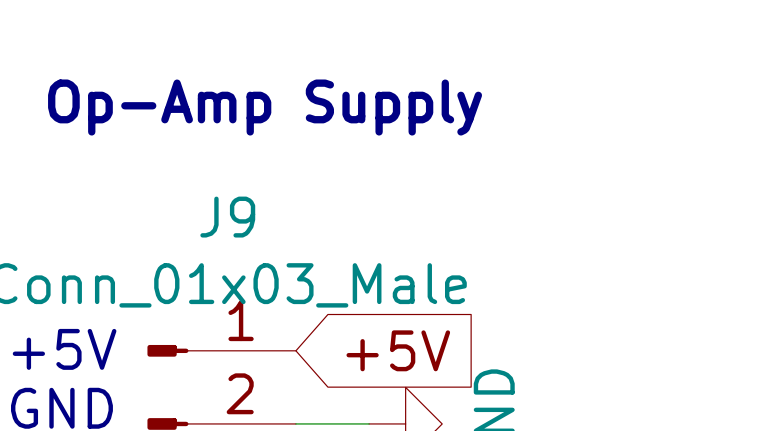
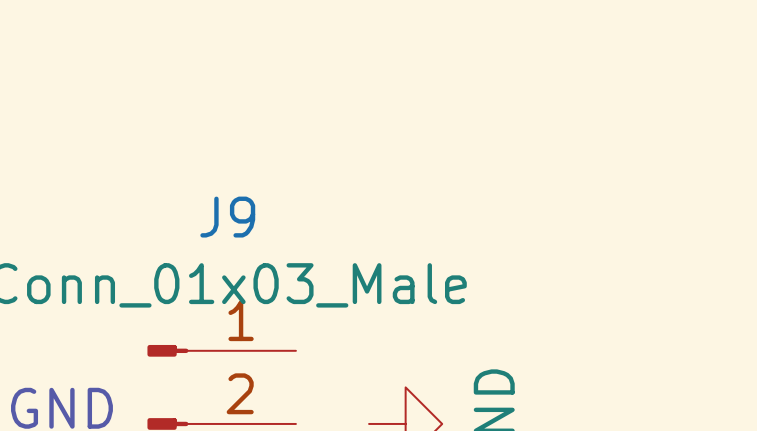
text: Op-Amp Supply (265, 107) -> none
text: +5V (64, 349) -> none
global label: +5V (398, 350) -> none
wire: (295, 423) (369, 423) -> none

